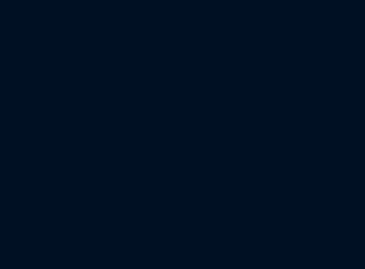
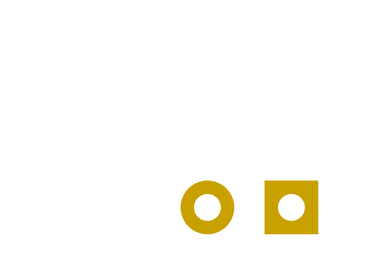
part: none -> (249, 207)

